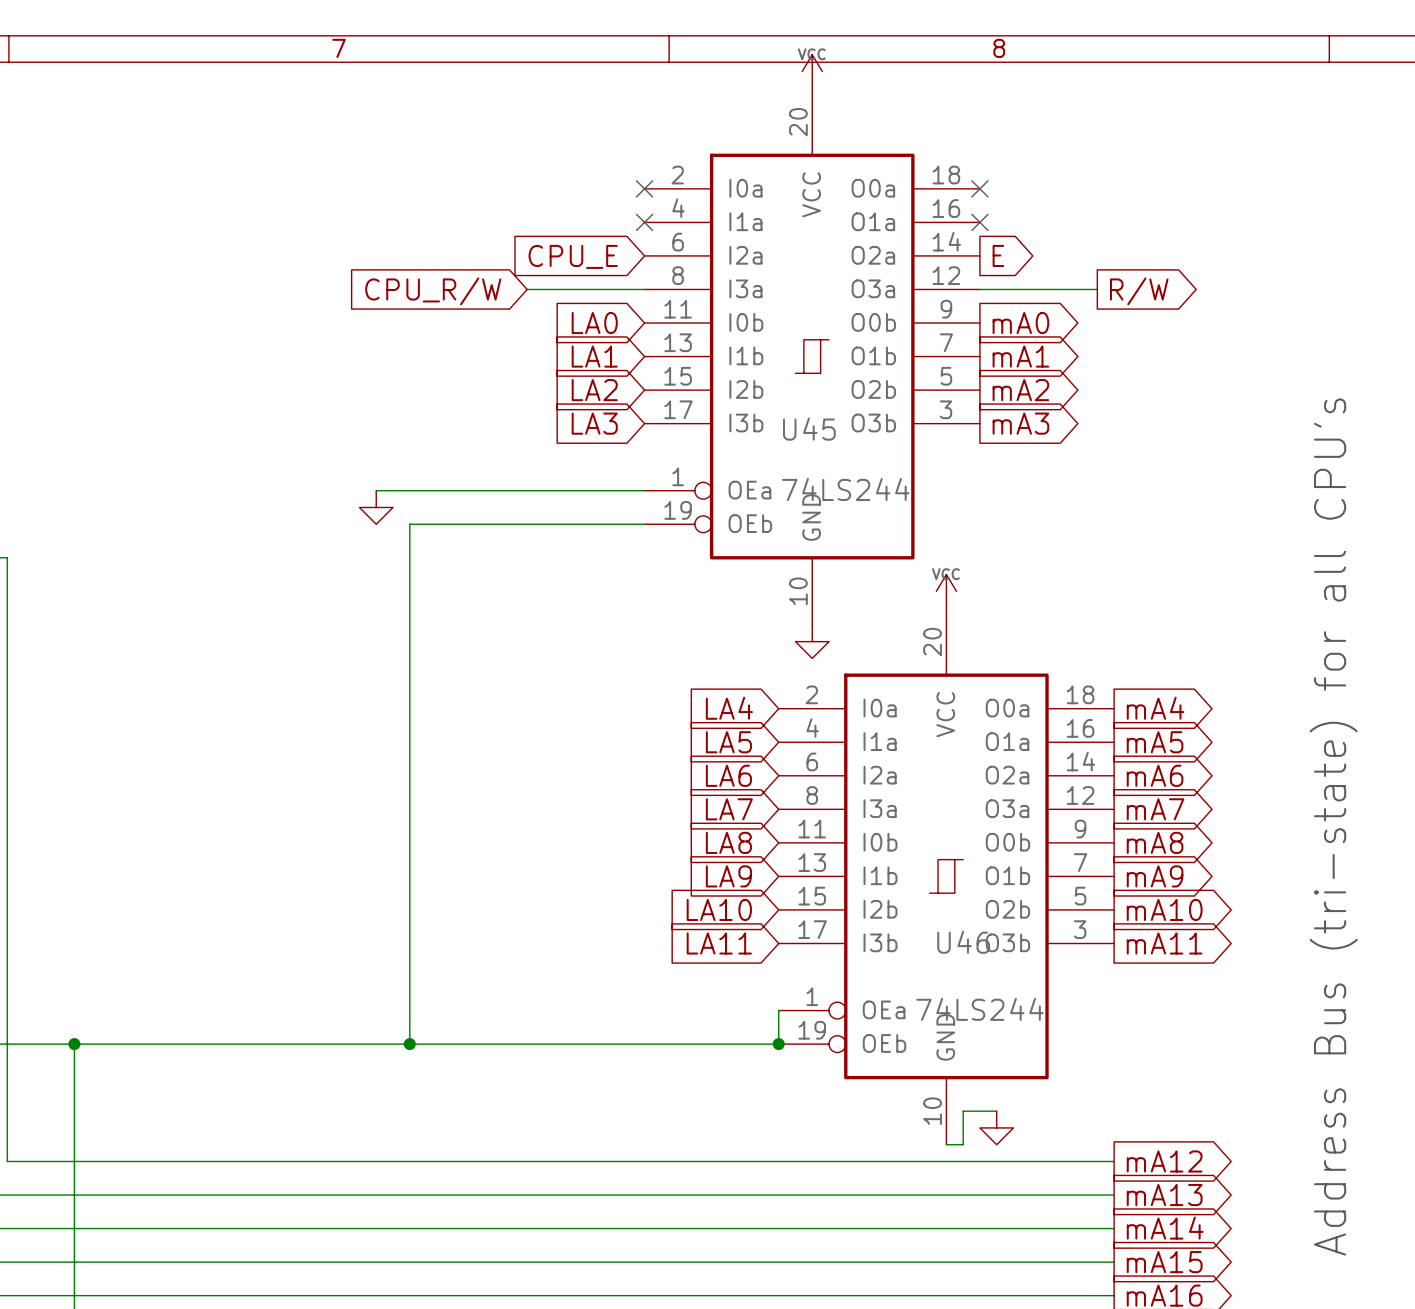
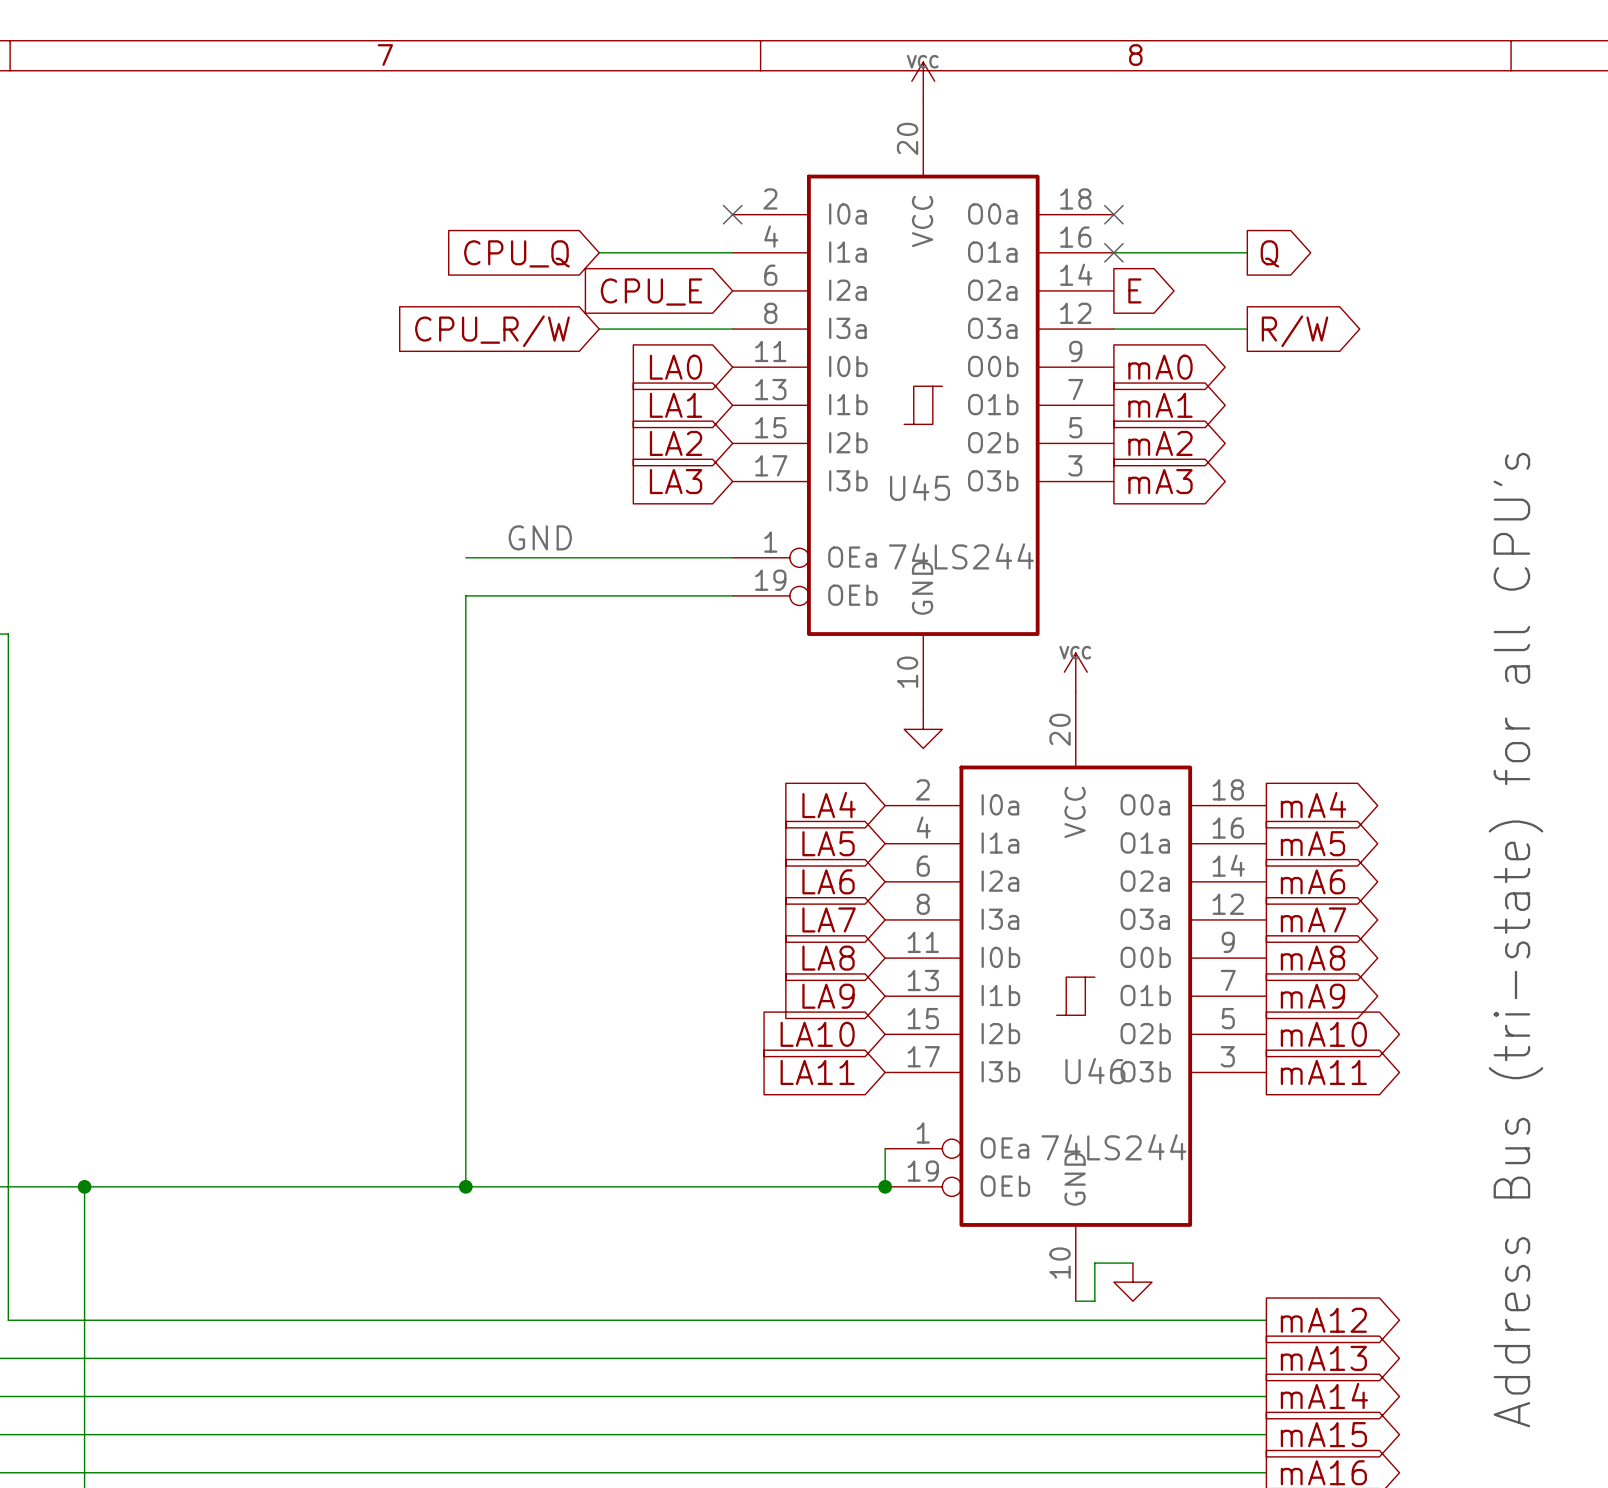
wire: none -> (599, 252) (732, 252)
no-connect mark: (644, 222) -> none
wire: none -> (1113, 252) (1247, 252)
global label: none -> CPU_Q (516, 253)
global label: none -> Q (1269, 253)
label: none -> GND (540, 537)
wire: (376, 490) (409, 490) -> none
power symbol: (376, 507) -> none

